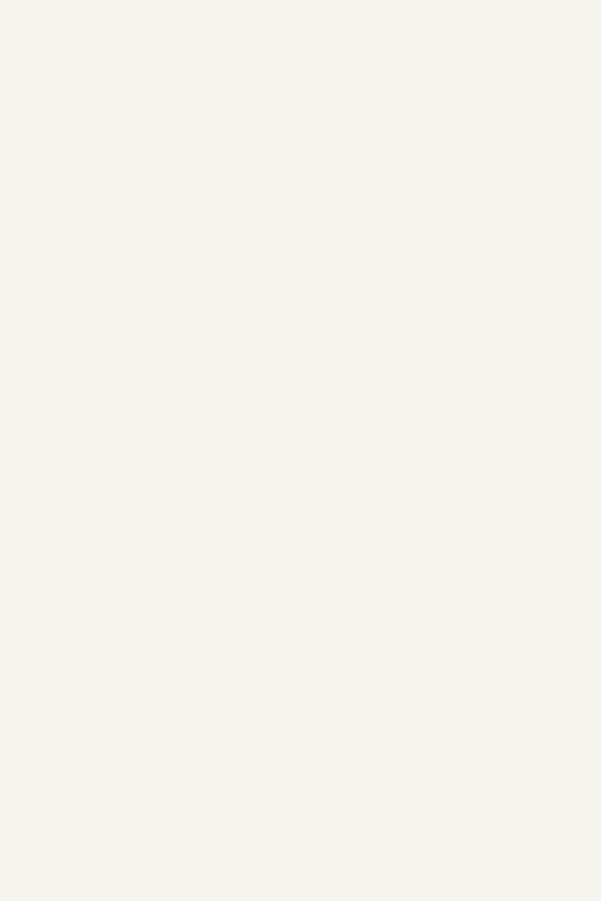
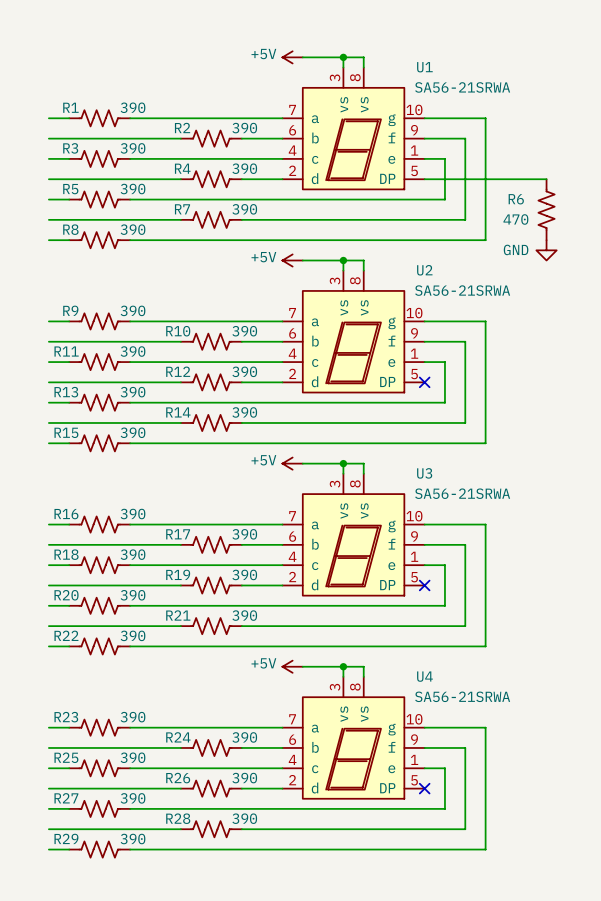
power symbol: none -> +5V (292, 57)
wire: none -> (302, 57) (363, 57) (363, 67)
wire: none -> (343, 57) (343, 67)
junction: none -> (343, 57)
wire: none -> (48, 118) (69, 118)
R1: none -> 390 (99, 118)
wire: none -> (130, 118) (282, 118)
wire: none -> (424, 118) (485, 118) (485, 240) (130, 240)
U1: none -> SA56-21SRWA (353, 128)
wire: none -> (48, 138) (180, 138)
R2: none -> 390 (211, 138)
wire: none -> (241, 138) (282, 138)
wire: none -> (424, 138) (465, 138) (465, 219) (241, 219)
wire: none -> (48, 158) (69, 158)
R3: none -> 390 (99, 158)
wire: none -> (130, 158) (282, 158)
wire: none -> (424, 158) (444, 158) (444, 199) (130, 199)
wire: none -> (48, 179) (180, 179)
R4: none -> 390 (211, 179)
wire: none -> (241, 179) (282, 179)
wire: none -> (424, 179) (546, 179)
wire: none -> (48, 199) (69, 199)
R5: none -> 390 (99, 199)
R6: none -> 470 (546, 209)
wire: none -> (48, 219) (180, 219)
R7: none -> 390 (211, 219)
wire: none -> (48, 240) (69, 240)
R8: none -> 390 (99, 240)
power symbol: none -> GND (546, 250)
power symbol: none -> +5V (292, 260)
wire: none -> (302, 260) (363, 260) (363, 270)
wire: none -> (343, 260) (343, 270)
junction: none -> (343, 260)
wire: none -> (48, 321) (69, 321)
R9: none -> 390 (99, 321)
wire: none -> (130, 321) (282, 321)
wire: none -> (424, 321) (485, 321) (485, 443) (130, 443)
U2: none -> SA56-21SRWA (353, 331)
wire: none -> (48, 341) (180, 341)
R10: none -> 390 (211, 341)
wire: none -> (241, 341) (282, 341)
wire: none -> (424, 341) (465, 341) (465, 422) (241, 422)
wire: none -> (48, 362) (69, 362)
R11: none -> 390 (99, 362)
wire: none -> (130, 362) (282, 362)
wire: none -> (424, 362) (444, 362) (444, 402) (130, 402)
wire: none -> (48, 382) (180, 382)
R12: none -> 390 (211, 382)
wire: none -> (241, 382) (282, 382)
no-connect mark: none -> (424, 382)
wire: none -> (48, 402) (69, 402)
R13: none -> 390 (99, 402)
wire: none -> (48, 422) (180, 422)
R14: none -> 390 (211, 422)
wire: none -> (48, 443) (69, 443)
R15: none -> 390 (99, 443)
power symbol: none -> +5V (292, 463)
wire: none -> (302, 463) (363, 463) (363, 473)
wire: none -> (343, 463) (343, 473)
junction: none -> (343, 463)
wire: none -> (48, 524) (69, 524)
R16: none -> 390 (99, 524)
wire: none -> (130, 524) (282, 524)
wire: none -> (424, 524) (485, 524) (485, 646) (130, 646)
U3: none -> SA56-21SRWA (353, 534)
wire: none -> (48, 544) (180, 544)
R17: none -> 390 (211, 544)
wire: none -> (241, 544) (282, 544)
wire: none -> (424, 544) (465, 544) (465, 626) (241, 626)
wire: none -> (48, 565) (69, 565)
R18: none -> 390 (99, 565)
wire: none -> (130, 565) (282, 565)
wire: none -> (424, 565) (444, 565) (444, 605) (130, 605)
wire: none -> (48, 585) (180, 585)
R19: none -> 390 (211, 585)
wire: none -> (241, 585) (282, 585)
no-connect mark: none -> (424, 585)
wire: none -> (48, 605) (69, 605)
R20: none -> 390 (99, 605)
wire: none -> (48, 626) (180, 626)
R21: none -> 390 (211, 626)
wire: none -> (48, 646) (69, 646)
R22: none -> 390 (99, 646)
power symbol: none -> +5V (292, 666)
wire: none -> (302, 666) (363, 666) (363, 676)
wire: none -> (343, 666) (343, 676)
junction: none -> (343, 666)
wire: none -> (48, 727) (69, 727)
R23: none -> 390 (99, 727)
wire: none -> (130, 727) (282, 727)
wire: none -> (424, 727) (485, 727) (485, 849) (130, 849)
U4: none -> SA56-21SRWA (353, 737)
wire: none -> (48, 747) (180, 747)
R24: none -> 390 (211, 747)
wire: none -> (241, 747) (282, 747)
wire: none -> (424, 747) (465, 747) (465, 829) (241, 829)
wire: none -> (48, 768) (69, 768)
R25: none -> 390 (99, 768)
wire: none -> (130, 768) (282, 768)
wire: none -> (424, 768) (444, 768) (444, 808) (130, 808)
wire: none -> (48, 788) (180, 788)
R26: none -> 390 (211, 788)
wire: none -> (241, 788) (282, 788)
no-connect mark: none -> (424, 788)
wire: none -> (48, 808) (69, 808)
R27: none -> 390 (99, 808)
wire: none -> (48, 829) (180, 829)
R28: none -> 390 (211, 829)
wire: none -> (48, 849) (69, 849)
R29: none -> 390 (99, 849)

